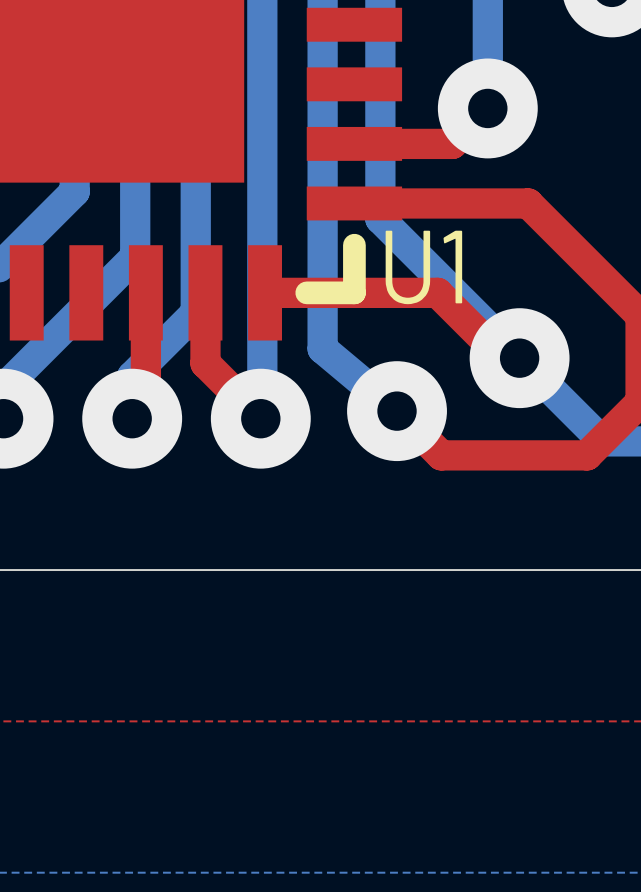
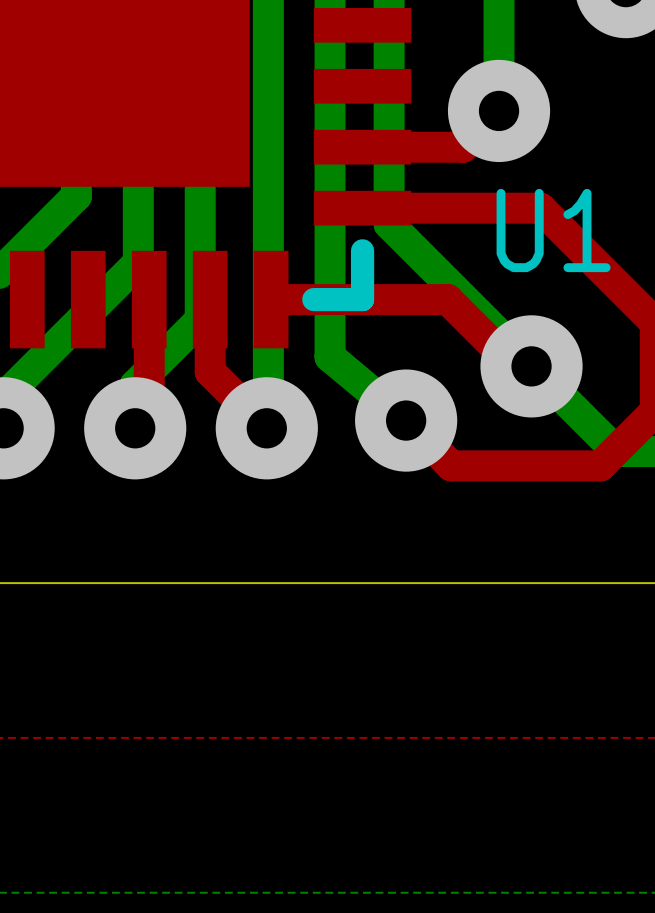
U1 name position: U1 (423, 267) -> U1 (553, 230)

